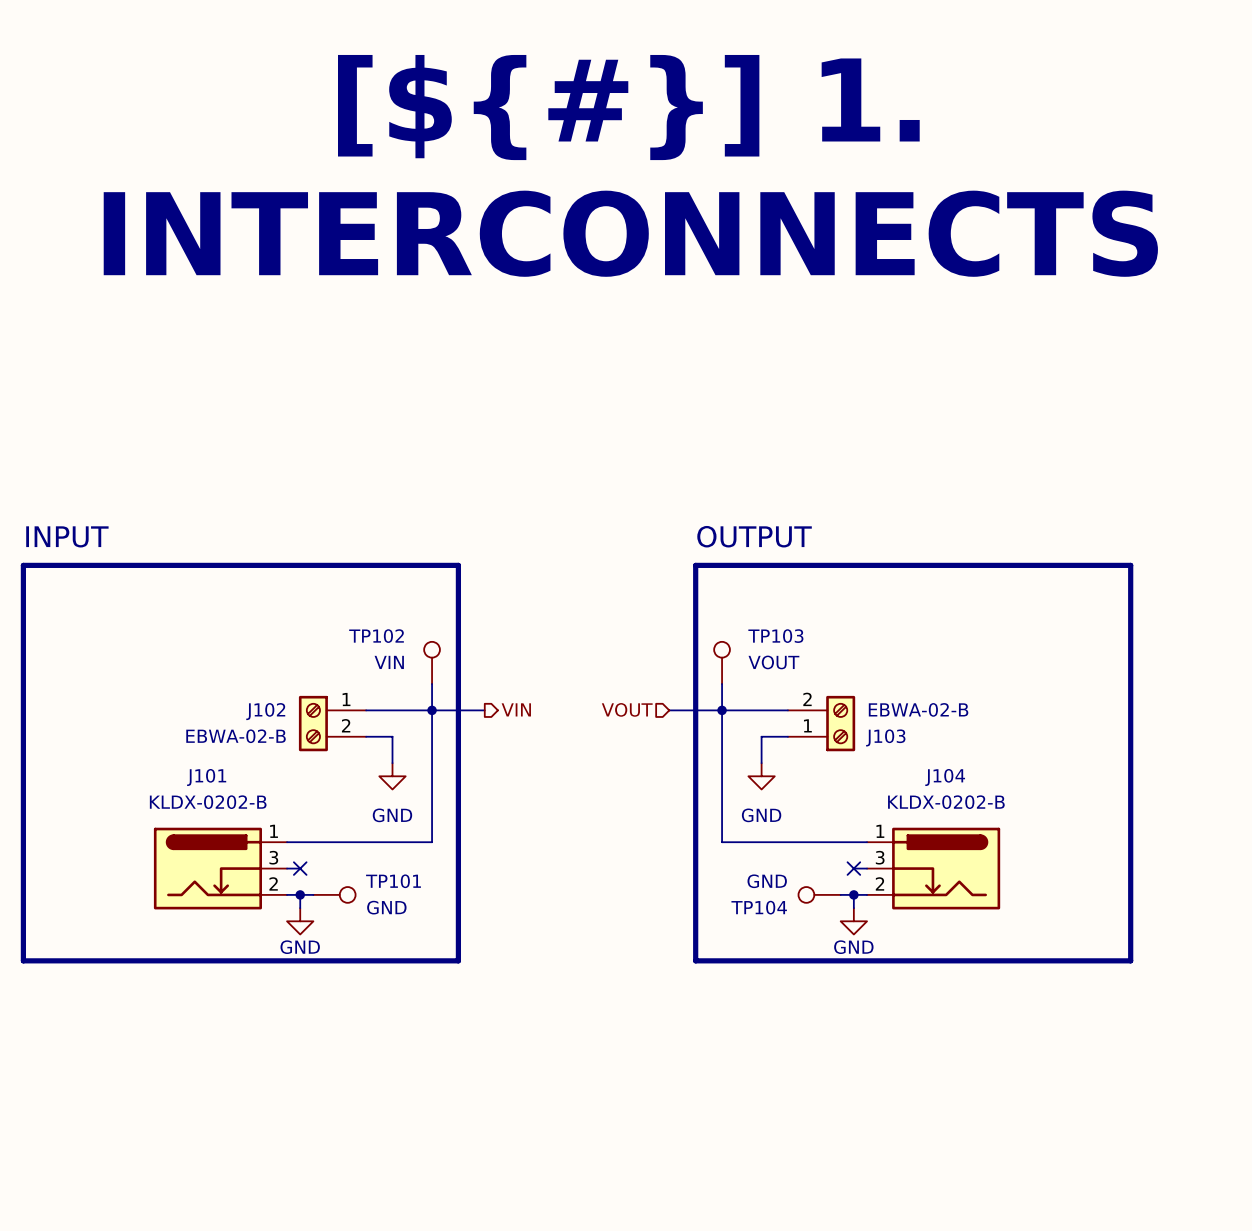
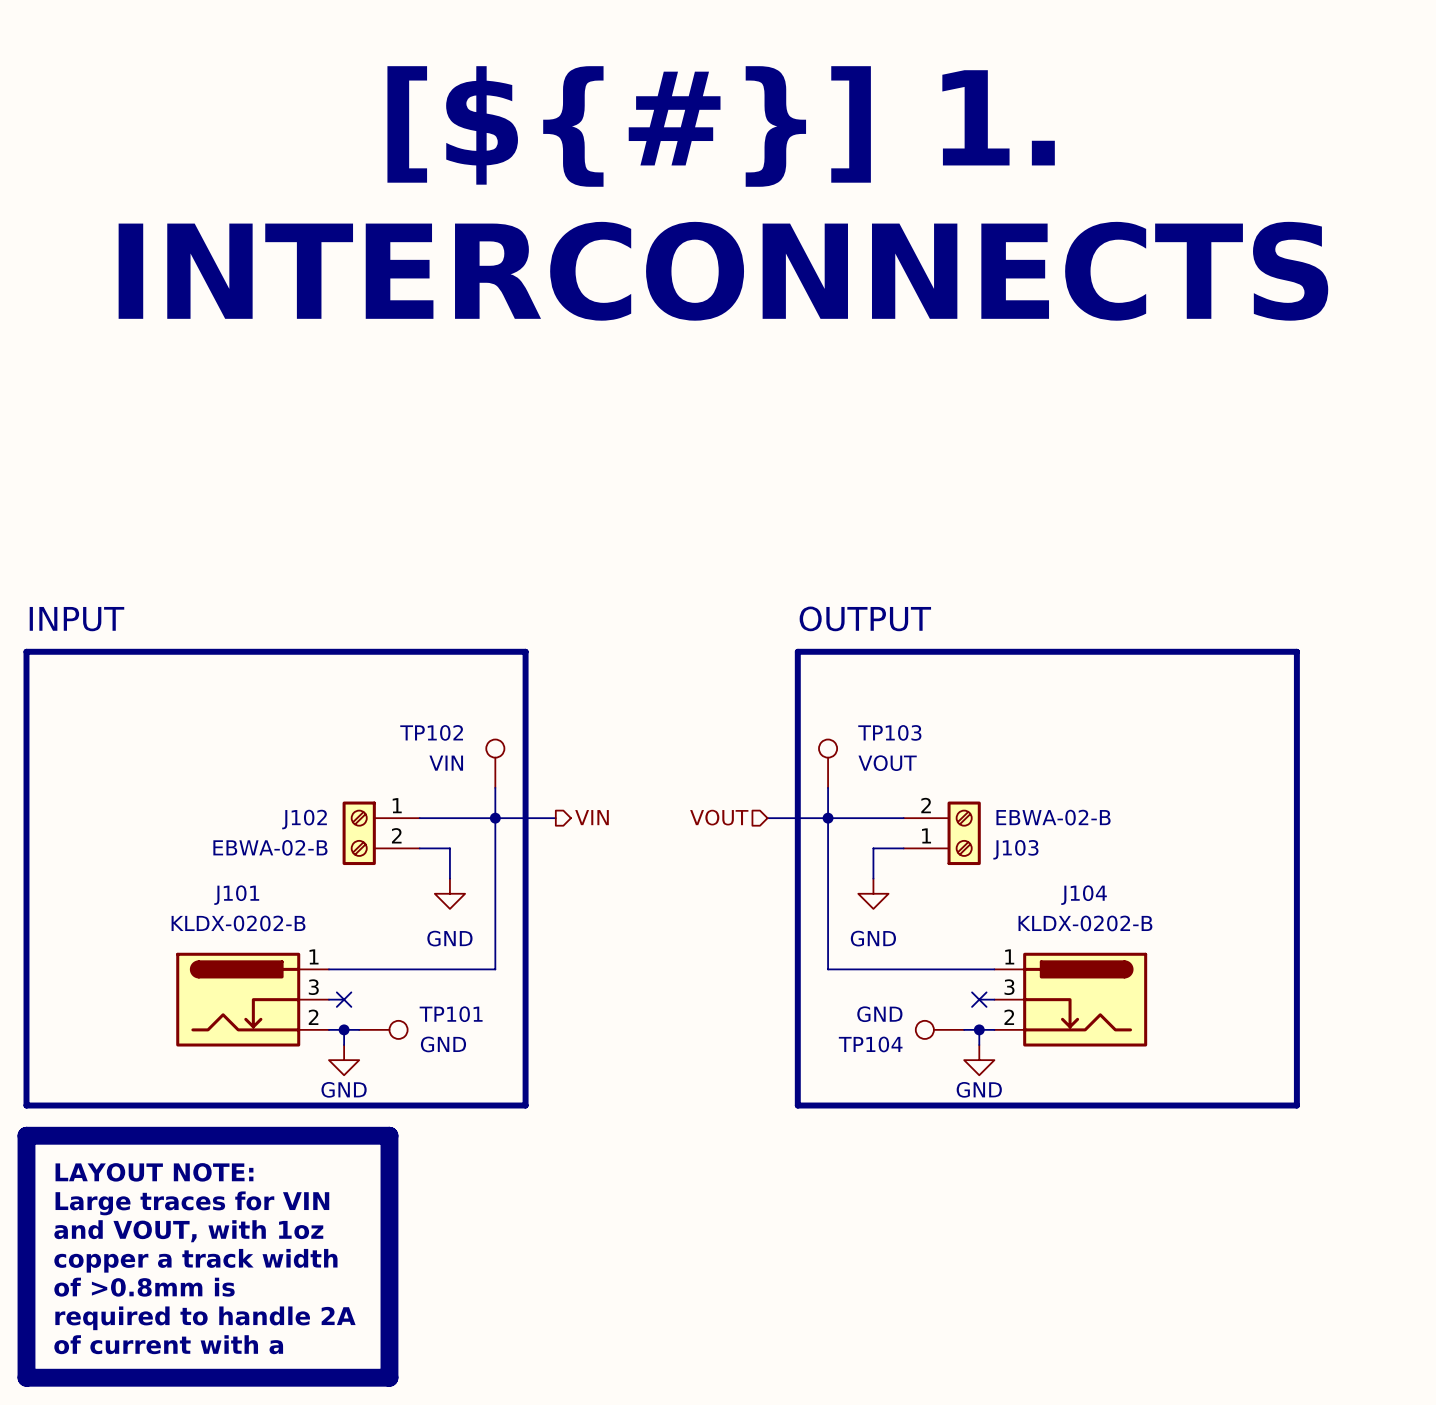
line: none -> (26, 1135) (389, 1135) (389, 1377) (26, 1377) (26, 1135)
text: none -> LAYOUT NOTE: (154, 1172)
text: none -> Large traces for VIN (192, 1203)
text: none -> and VOUT, with 1oz (188, 1231)
text: none -> copper a track width (195, 1260)
text: none -> of >0.8mm is (144, 1287)
text: none -> required to handle 2A (205, 1318)
text: none -> of current with a (168, 1344)

